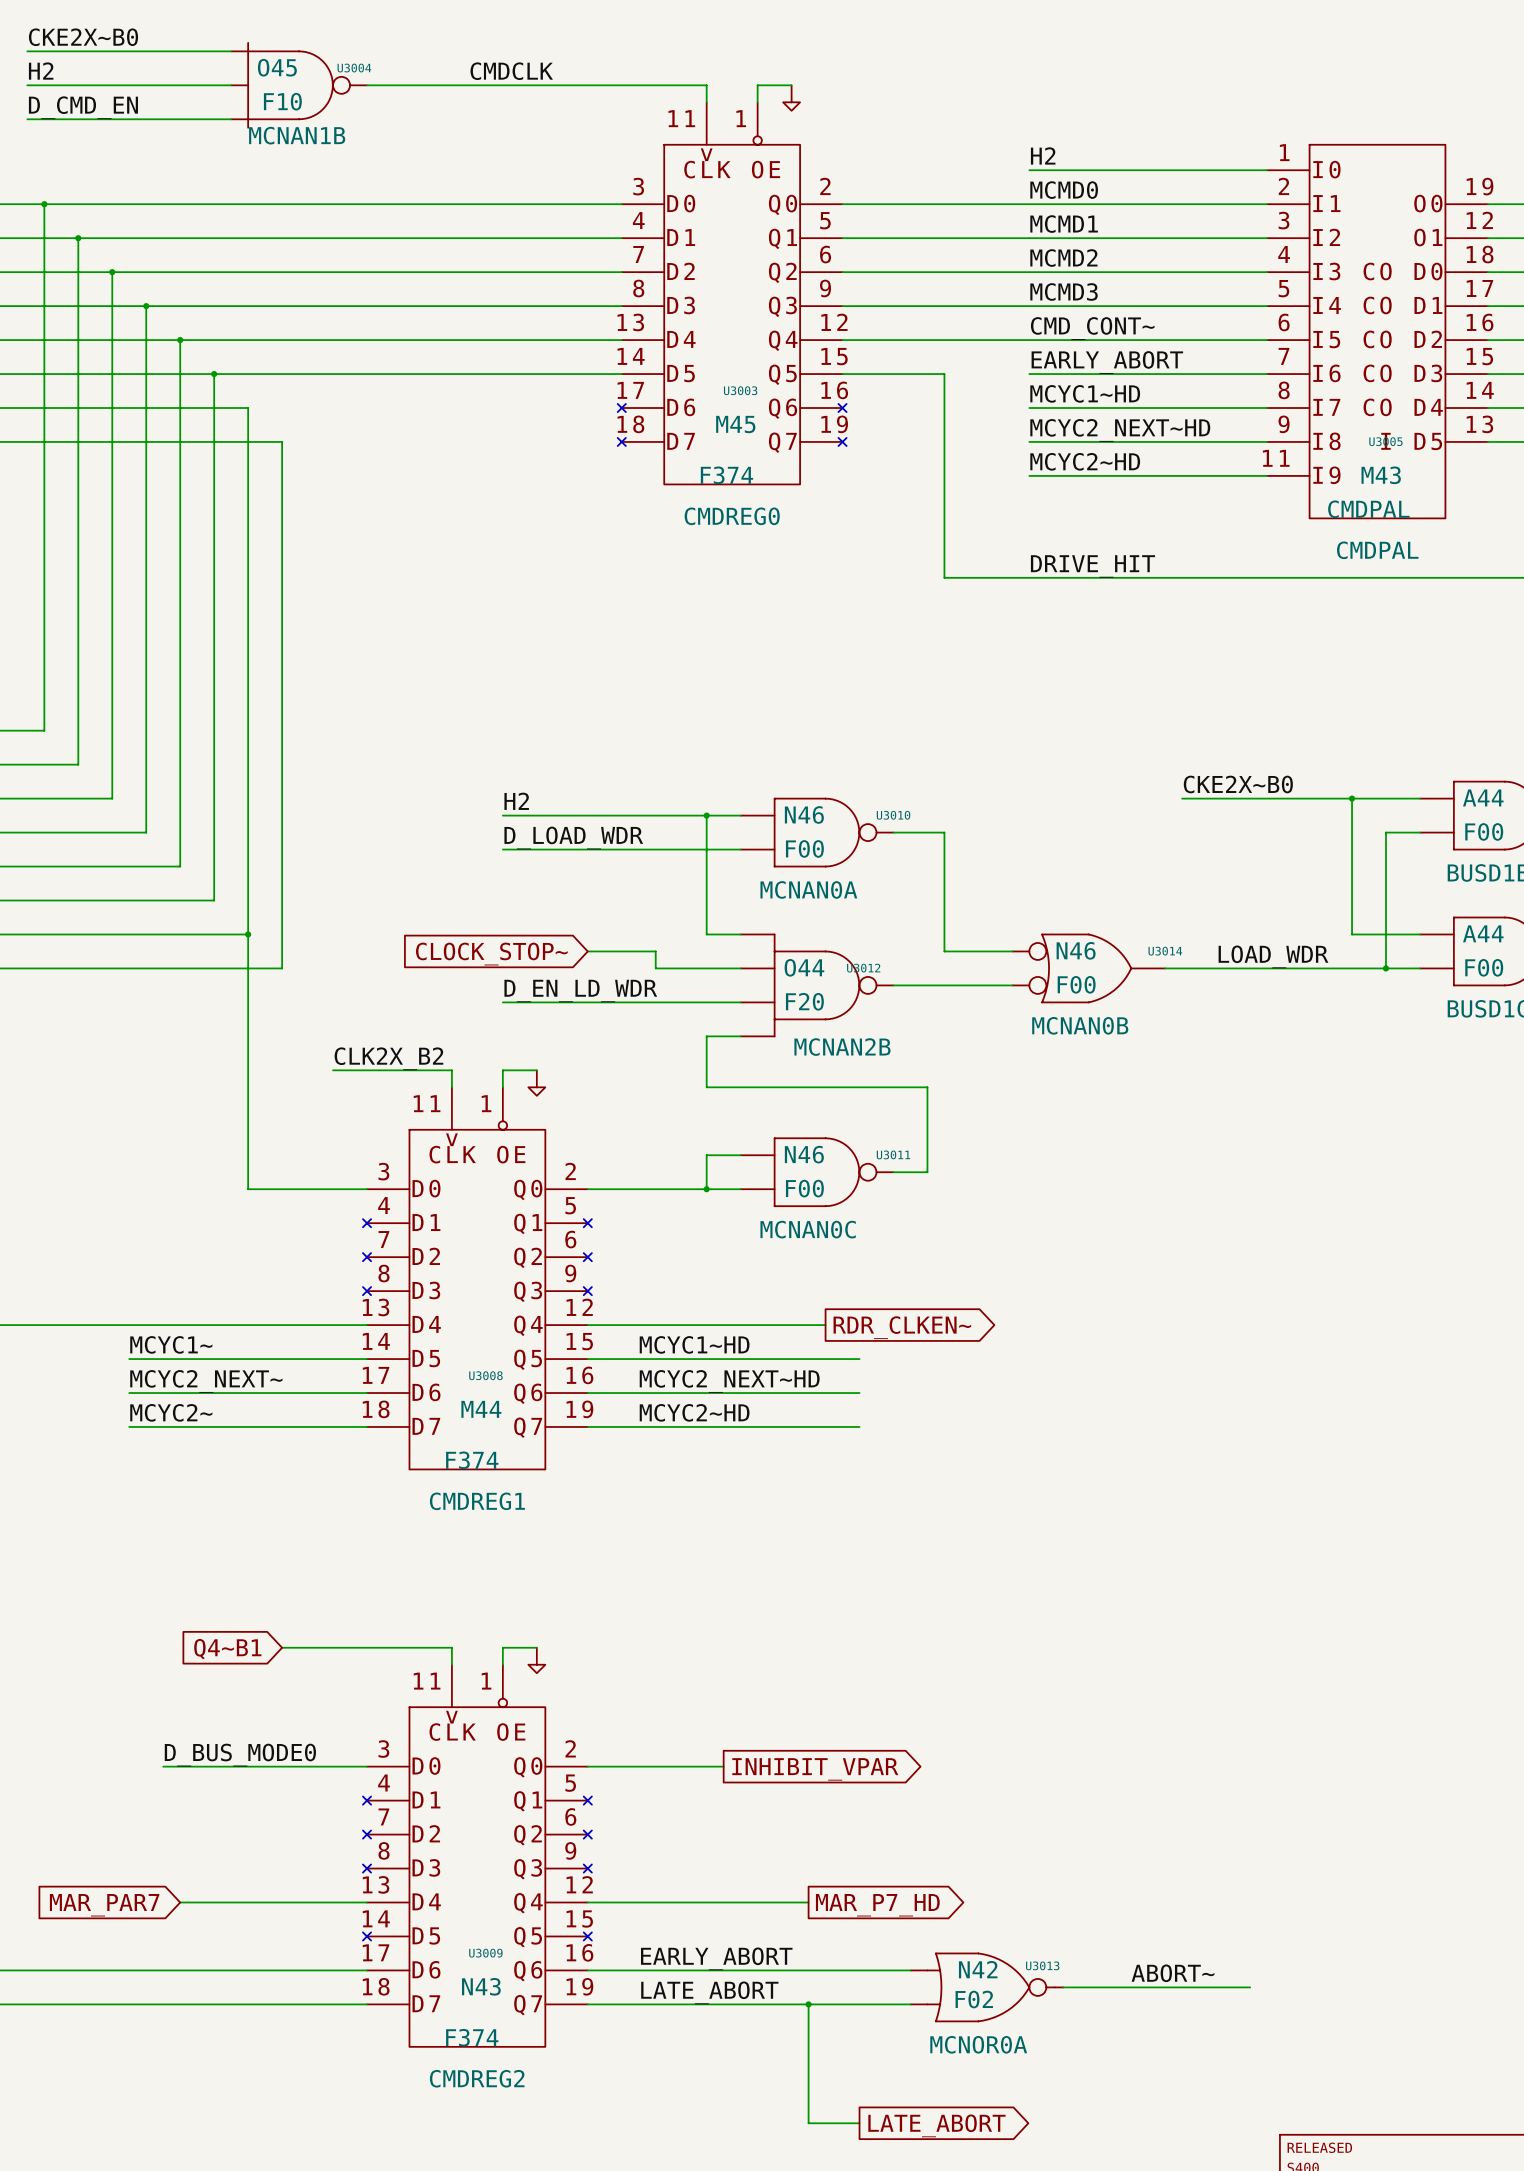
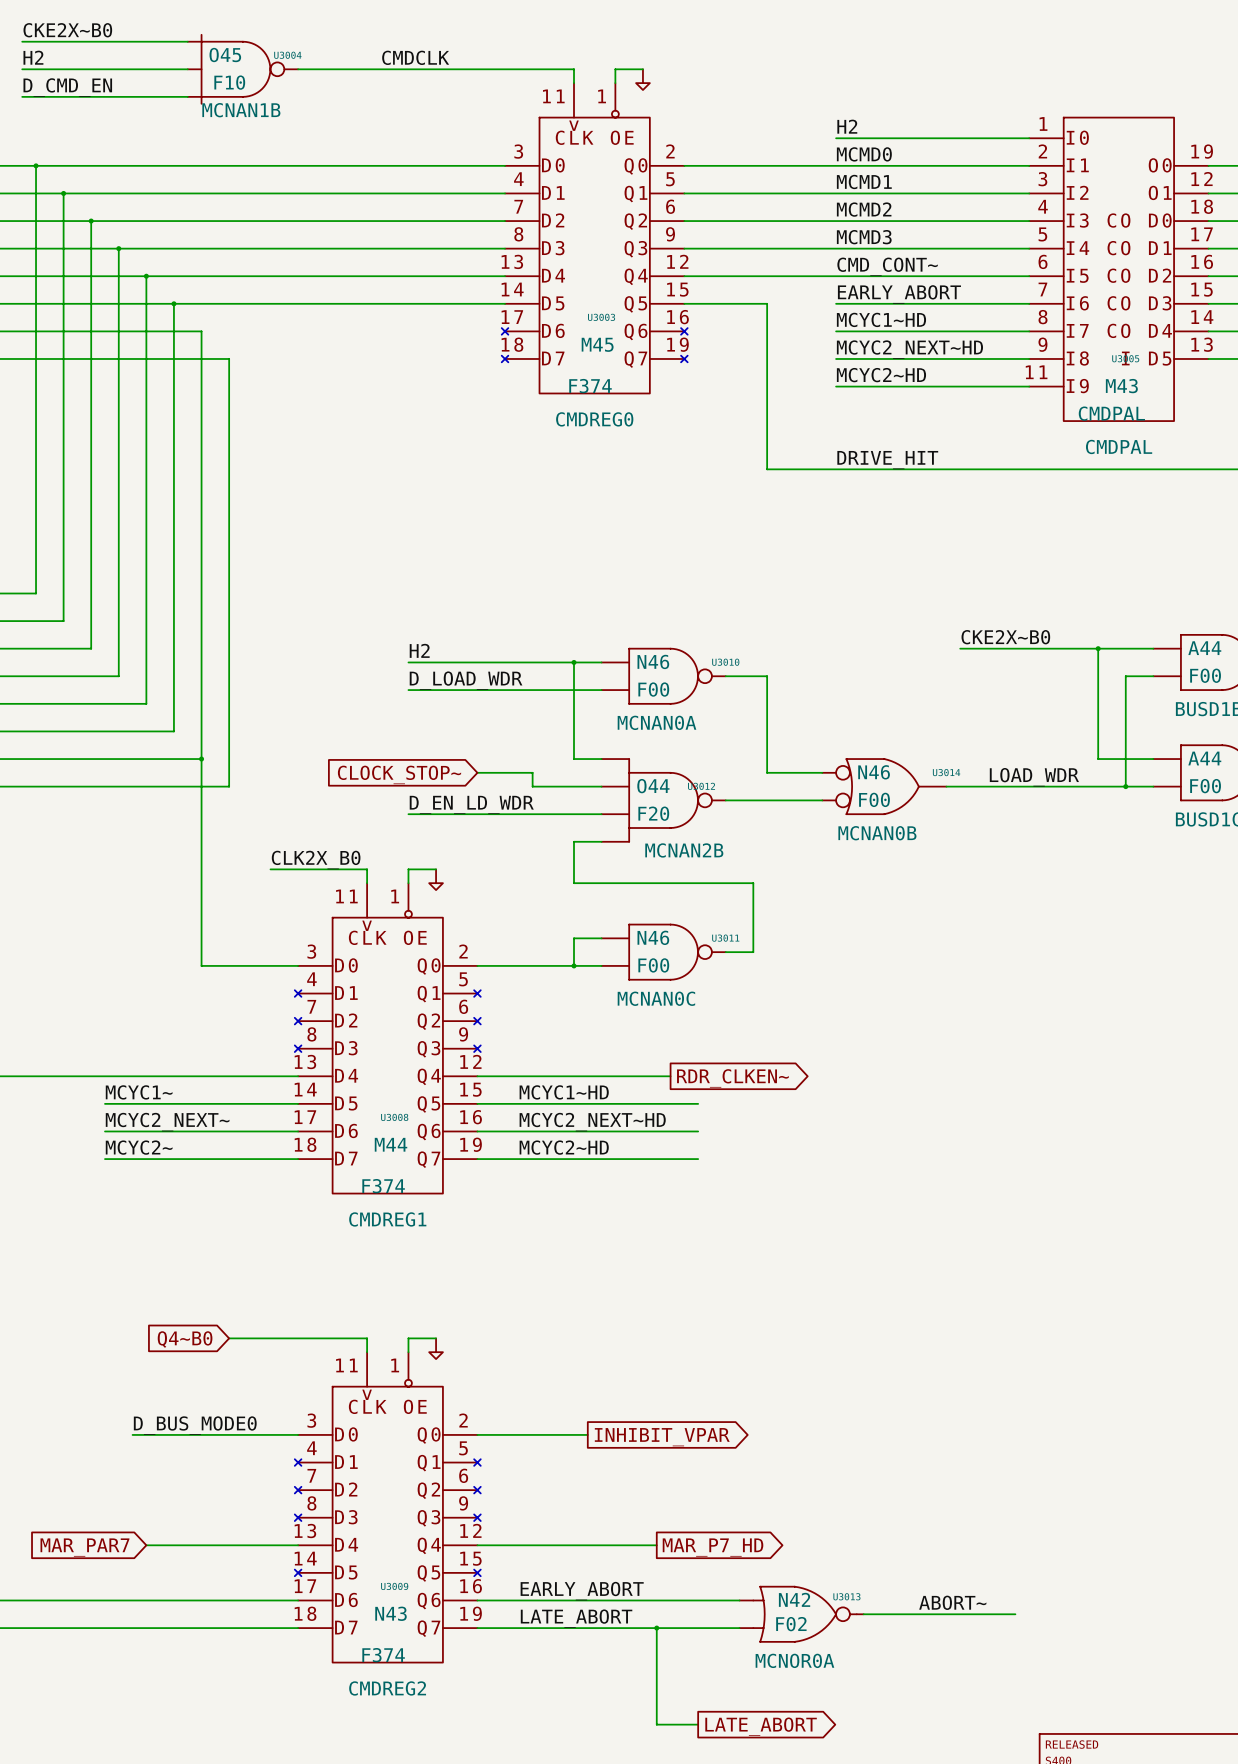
label: CLK2X_B2 (388, 1058) -> CLK2X_B0 (316, 860)
global label: Q4~B1 (227, 1649) -> Q4~B0 (185, 1339)

